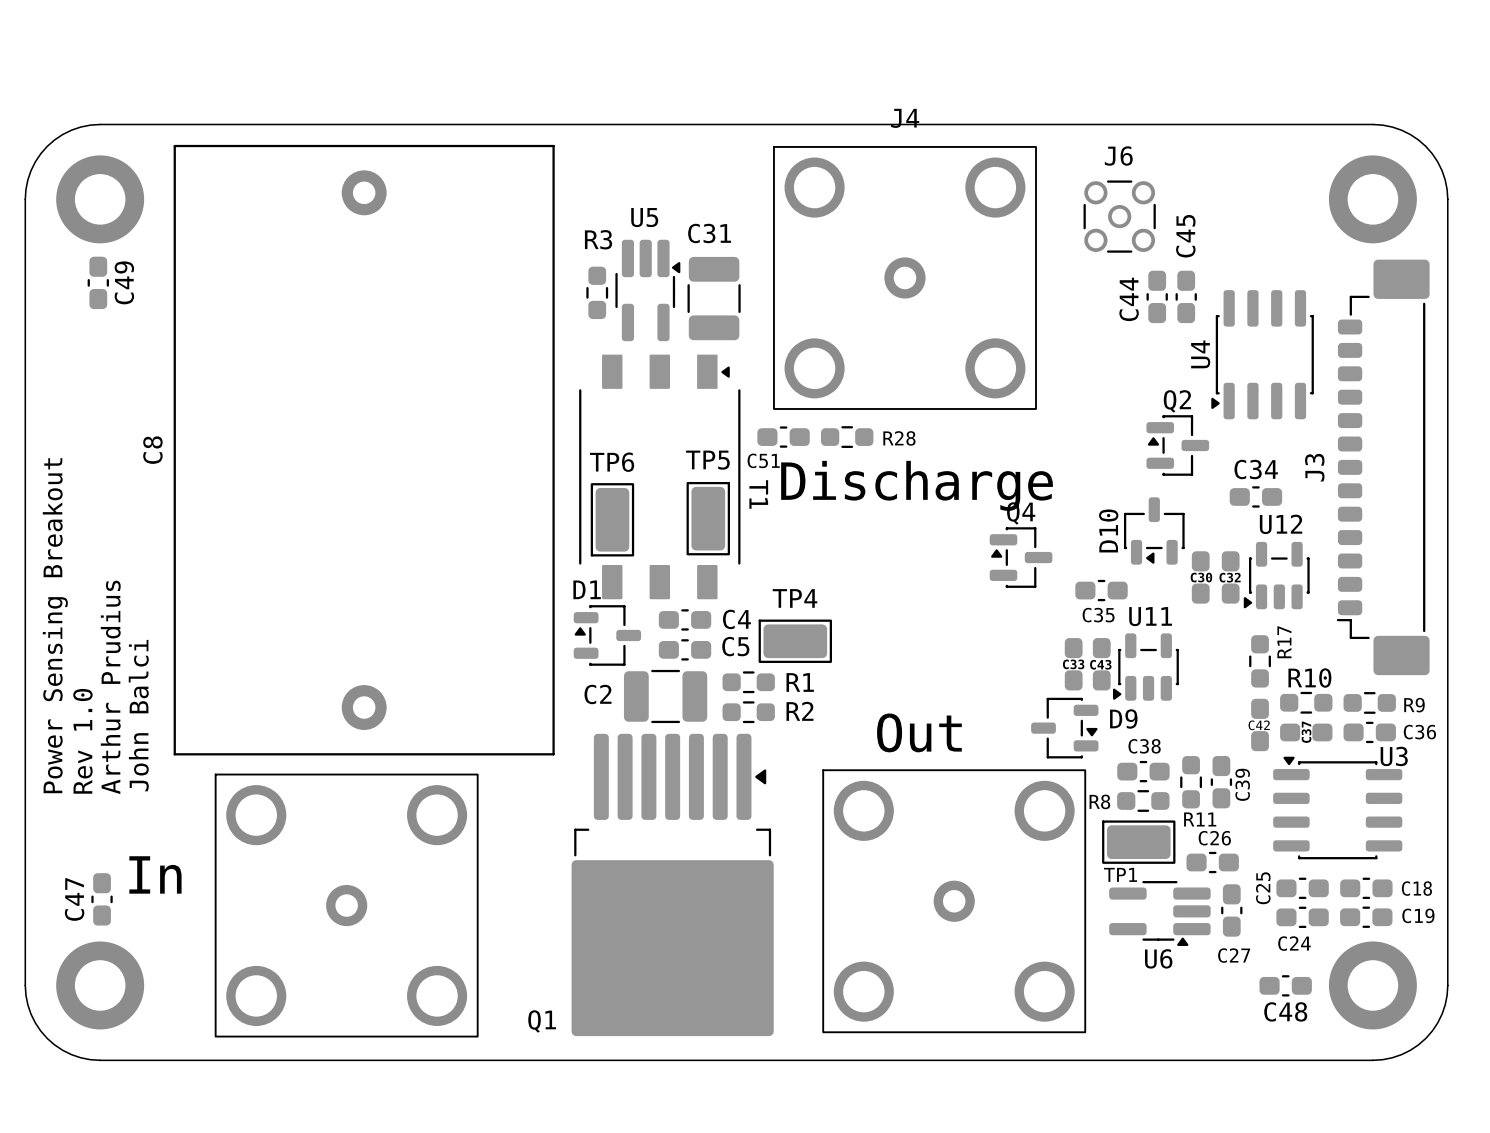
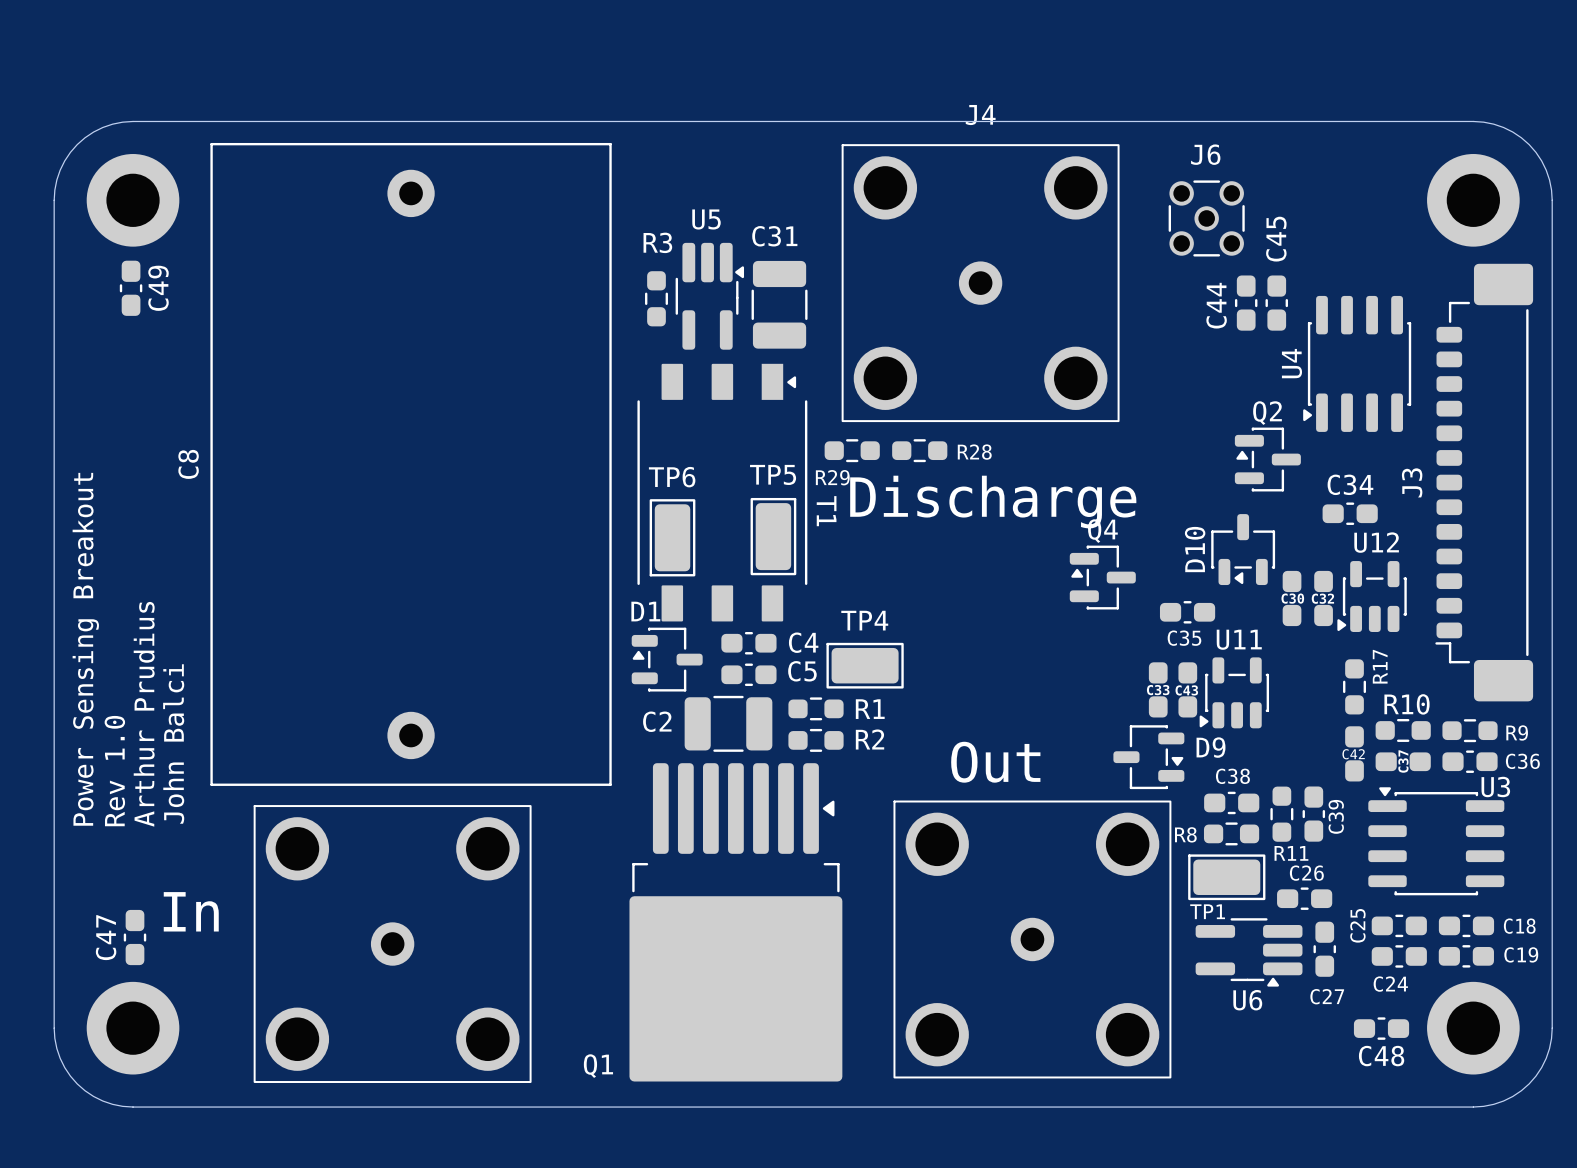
C51: (783, 437) -> none
R29: none -> (852, 450)

